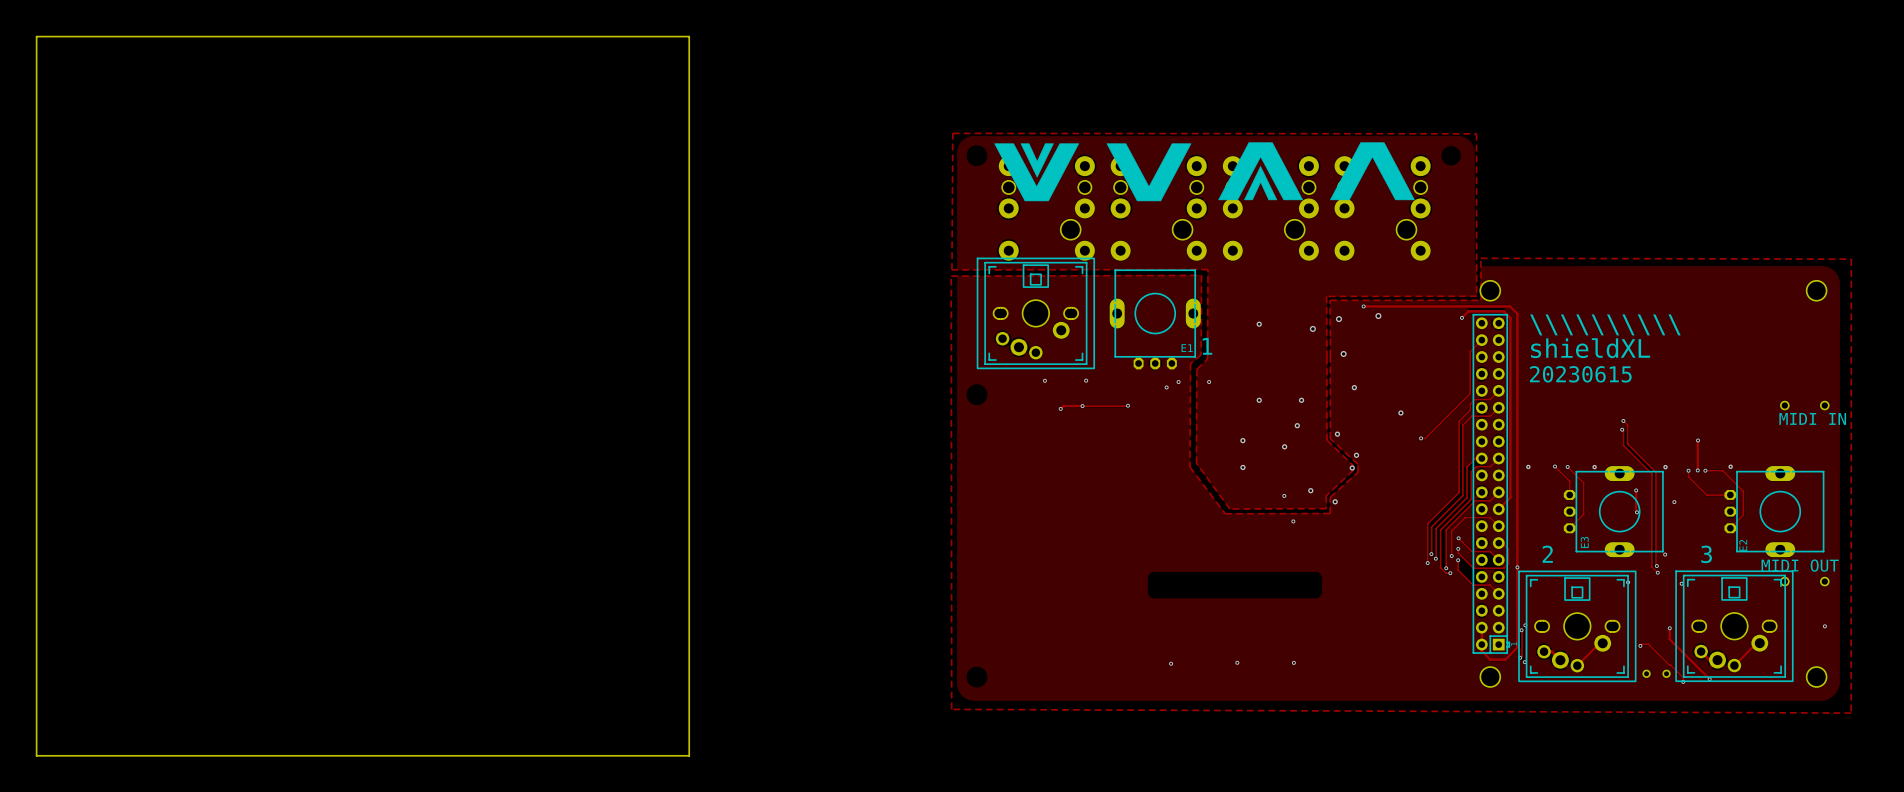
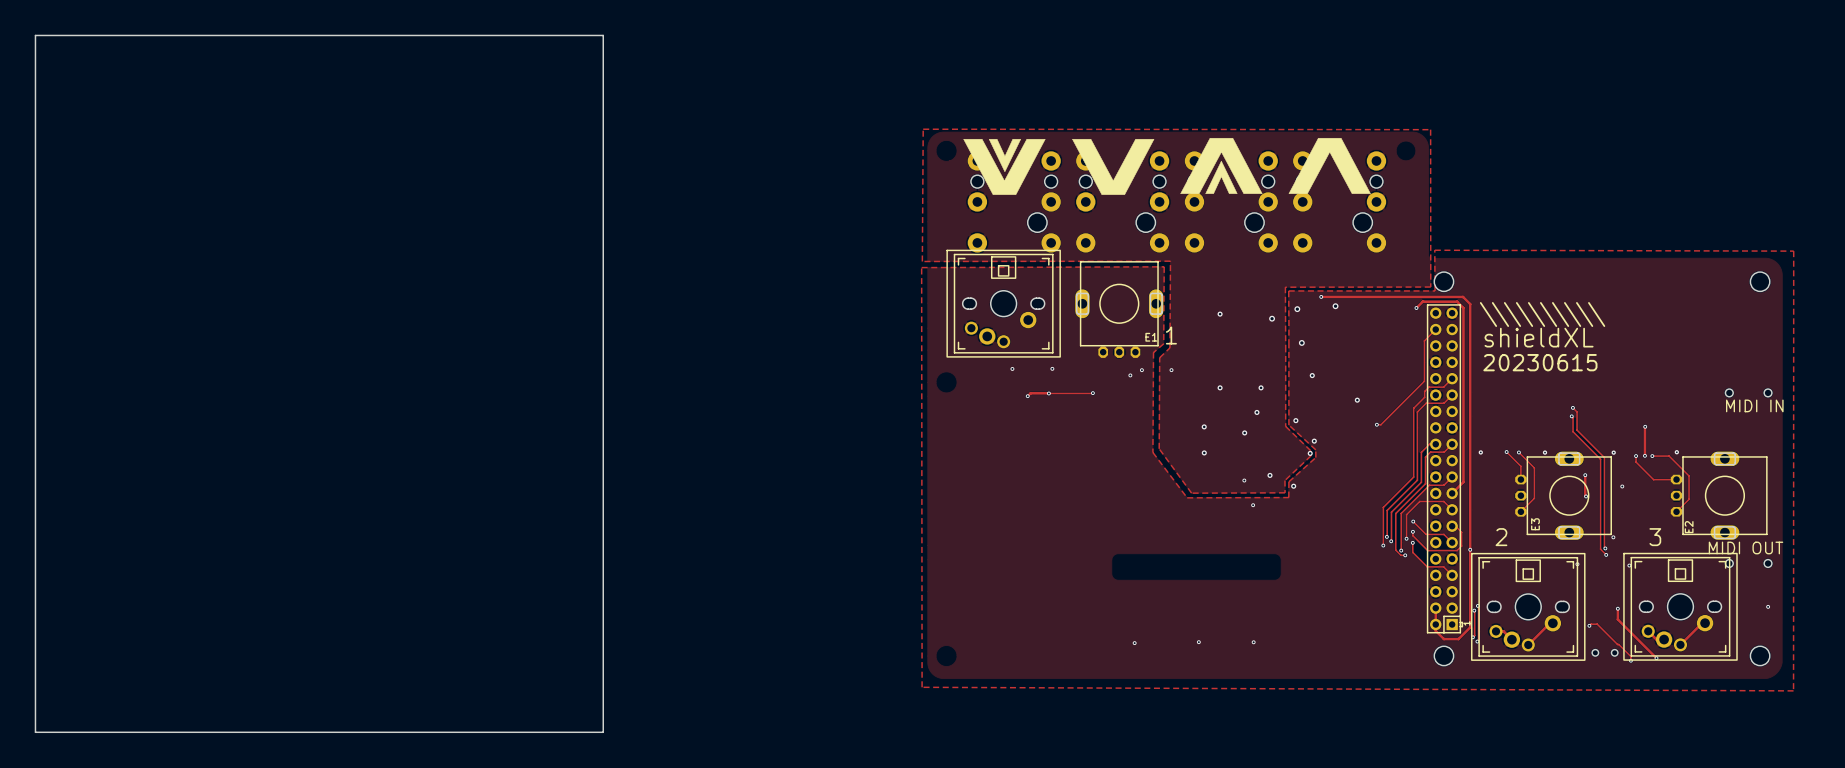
board edge: (622, 36) (689, 36) (689, 755) (622, 755) -> (603, 35) (603, 732)

